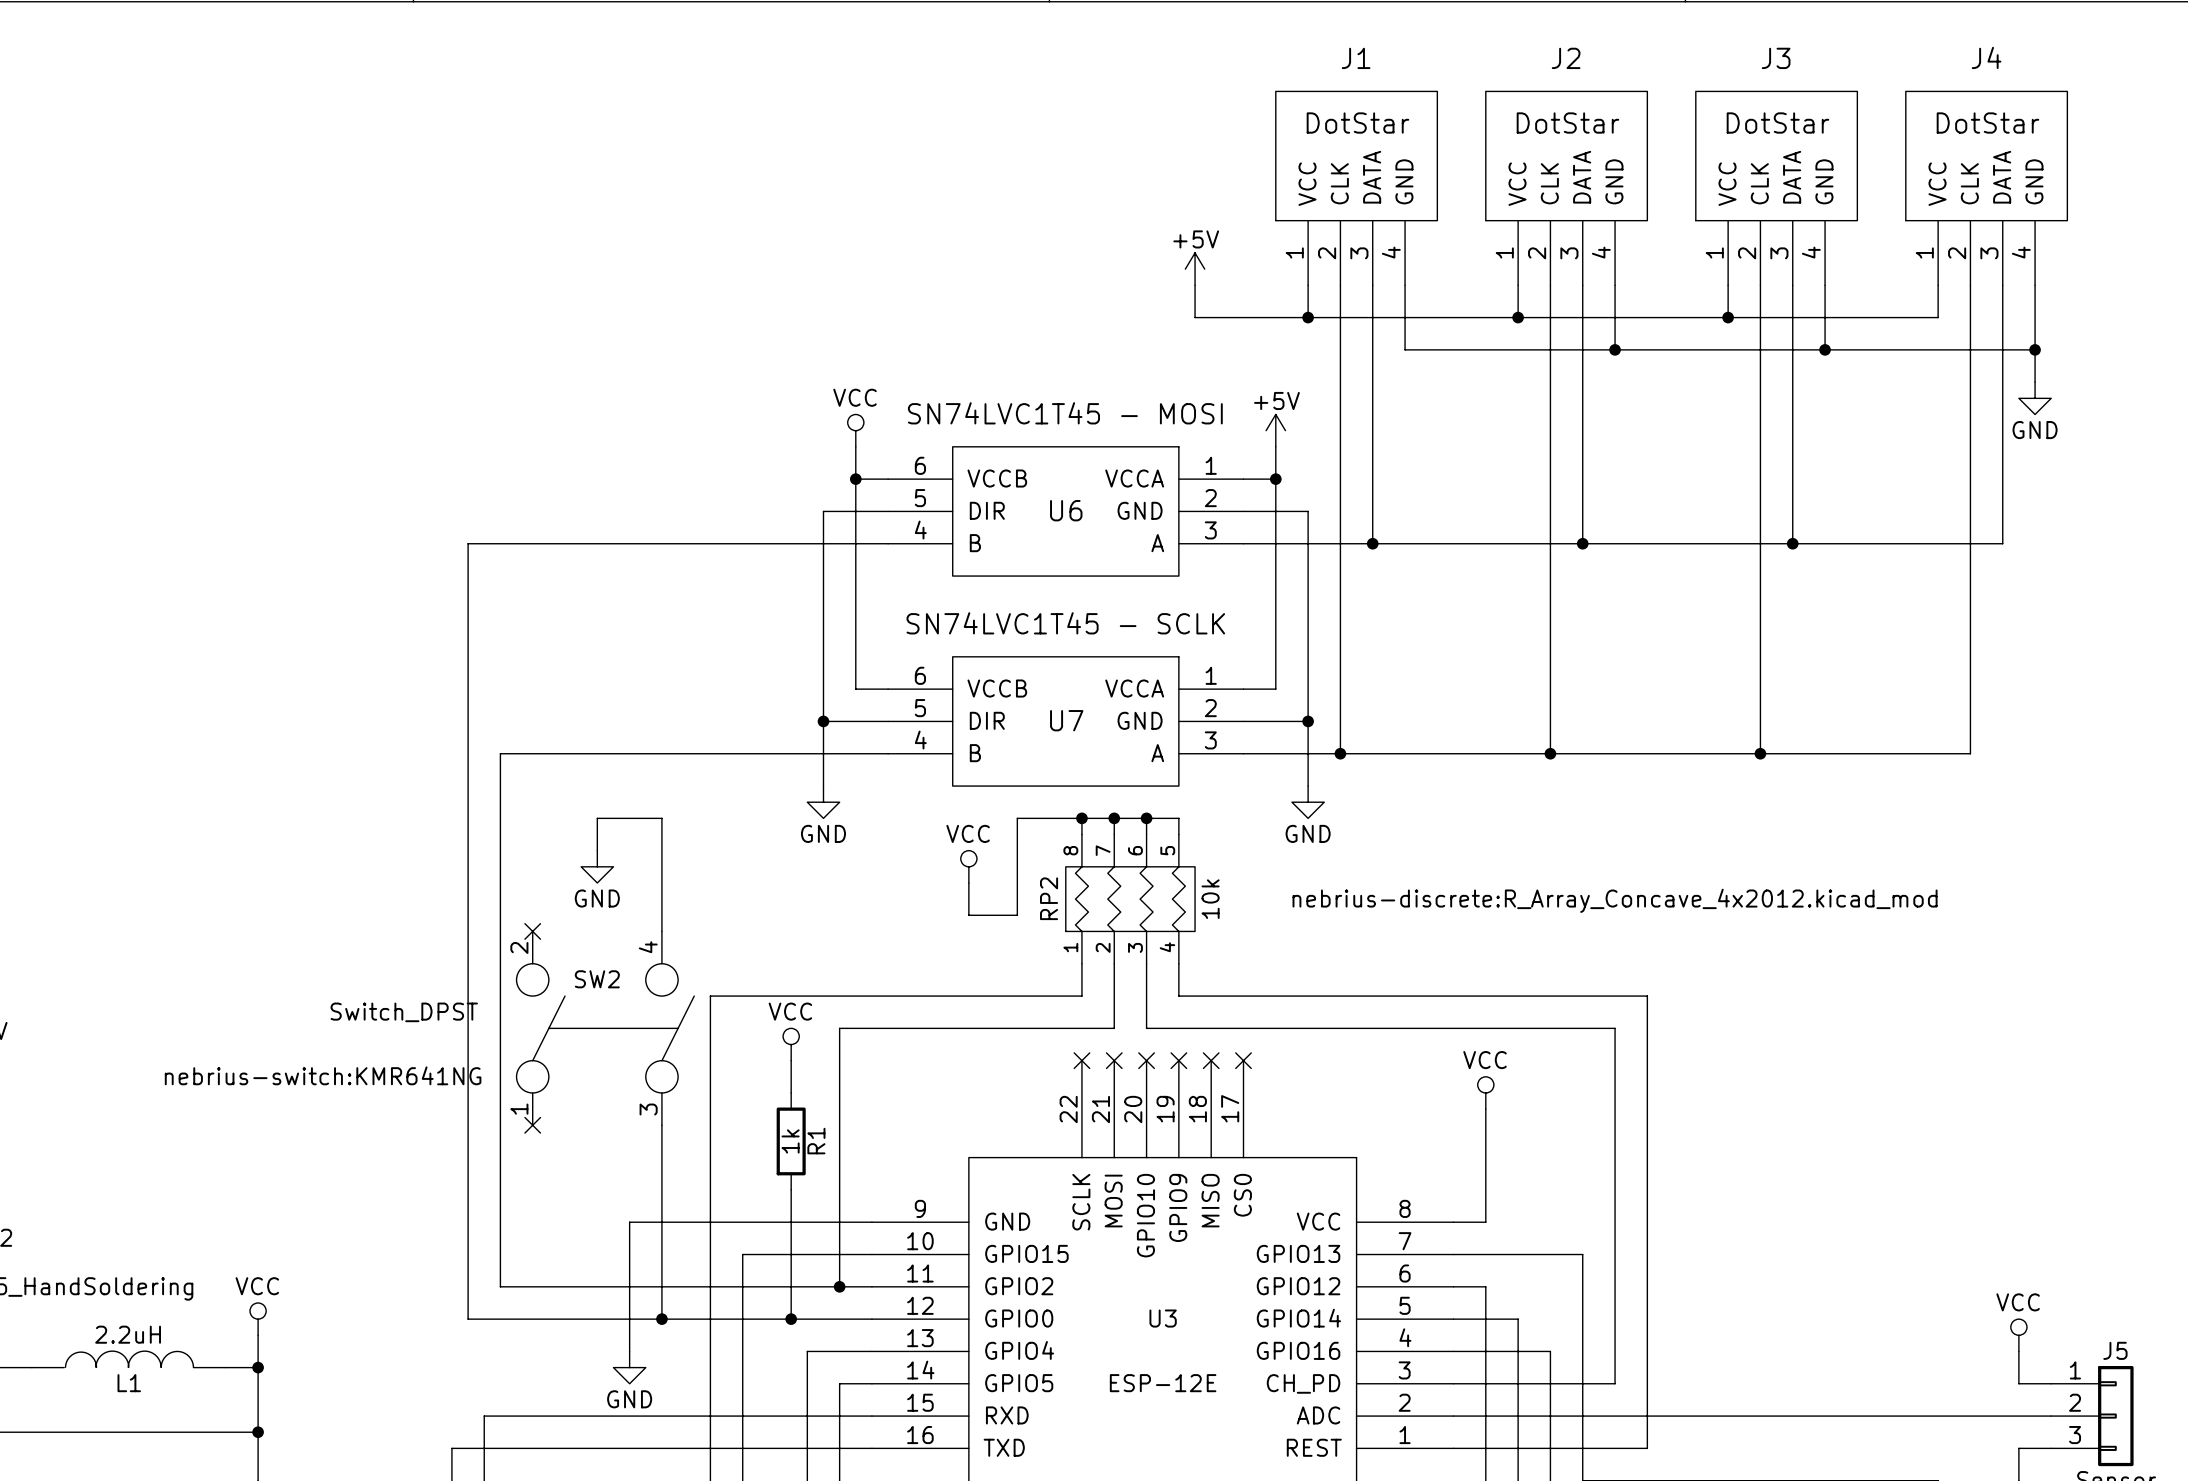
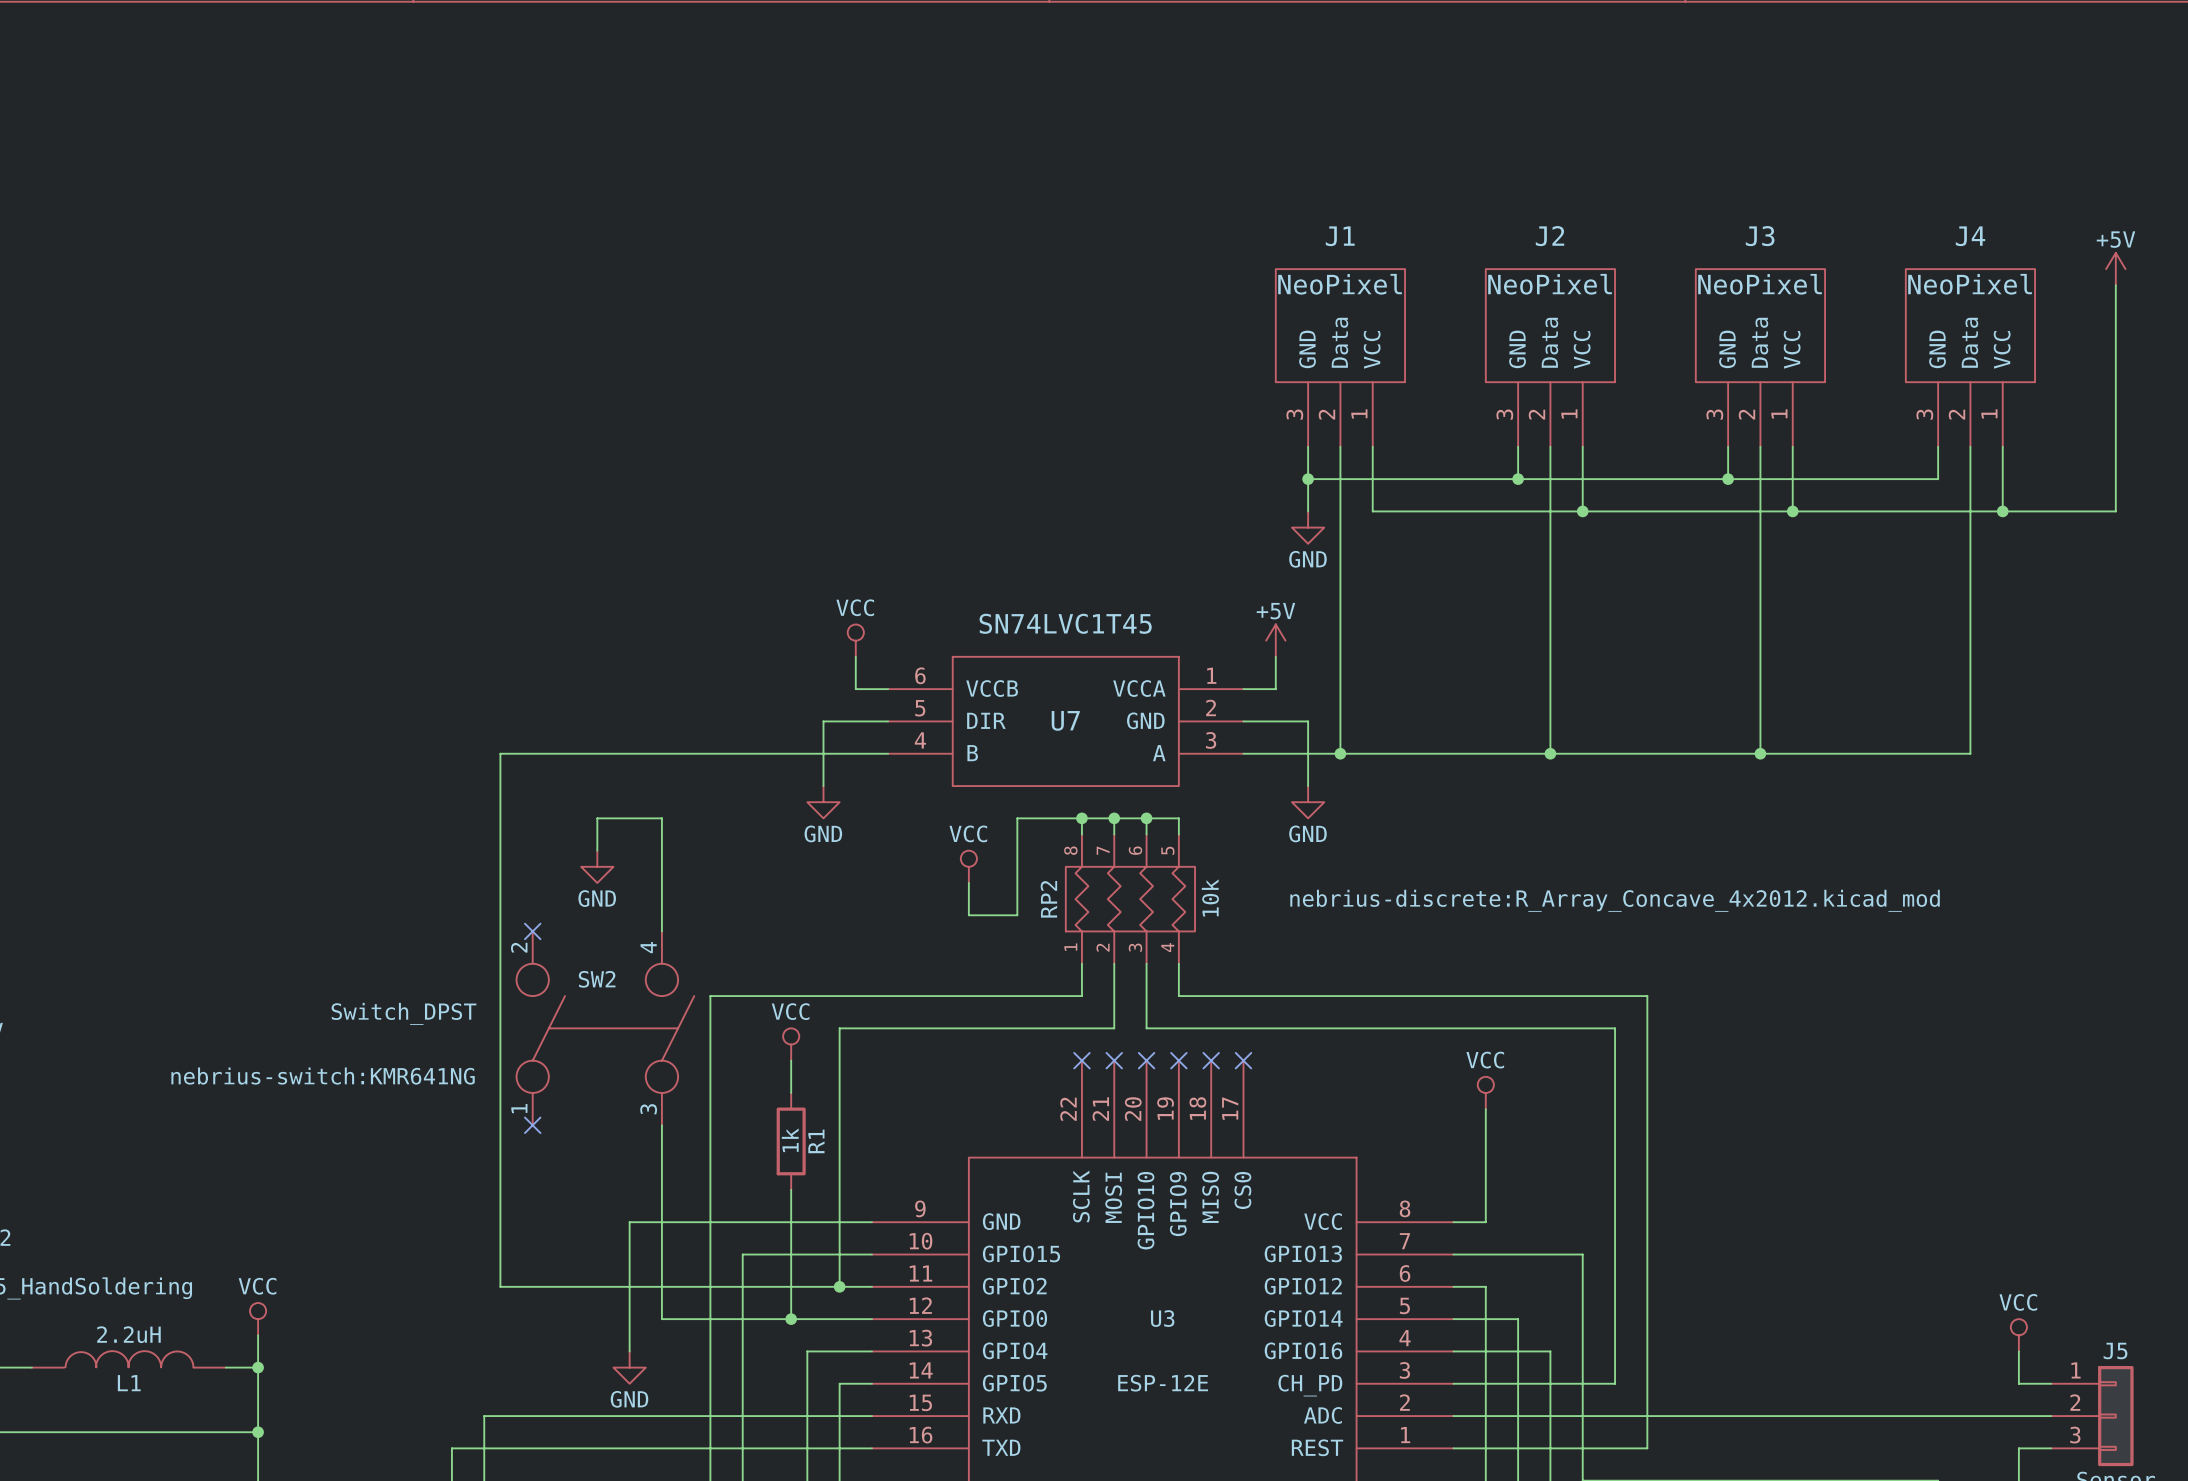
J1 symbol: [1275, 91, 1438, 286] -> [1275, 269, 1406, 447]
J2 symbol: [1485, 91, 1648, 286] -> [1485, 269, 1616, 447]
J3 symbol: [1695, 91, 1858, 286] -> [1695, 269, 1826, 447]
J4 symbol: [1905, 91, 2068, 286] -> [1905, 269, 2036, 447]
J1 value: DotStar (1357, 123) -> NeoPixel (1340, 284)
J2 value: DotStar (1567, 123) -> NeoPixel (1550, 284)
J3 value: DotStar (1777, 123) -> NeoPixel (1760, 284)
J4 value: DotStar (1987, 123) -> NeoPixel (1970, 284)
power symbol: +5V (1195, 269) -> none
power symbol: none -> +5V (2115, 269)
wire: (1195, 285) (1195, 317) (1938, 317) (1938, 285) -> none
wire: (1308, 285) (1308, 317) -> none
wire: (1340, 285) (1340, 446) -> none
wire: (1372, 285) (1372, 446) -> none
wire: (1405, 285) (1405, 349) (2035, 349) -> none
wire: (1518, 285) (1518, 317) -> none
wire: (1550, 285) (1550, 446) -> none
wire: (1582, 285) (1582, 446) -> none
wire: (1728, 285) (1728, 317) -> none
wire: (1760, 285) (1760, 446) -> none
wire: (1792, 285) (1792, 446) -> none
wire: (1970, 285) (1970, 446) -> none
wire: (2002, 285) (2002, 446) -> none
junction: (1308, 317) -> none
junction: (1518, 317) -> none
junction: (1728, 317) -> none
junction: (1615, 349) -> none
junction: (1825, 349) -> none
junction: (2035, 349) -> none
power symbol: GND (2035, 398) -> none
power symbol position: VCC (855, 430) -> VCC (855, 640)
power symbol: +5V (1275, 430) -> none
wire: (855, 446) (855, 656) -> none
wire: (1275, 446) (1275, 656) -> none
wire: none -> (1308, 446) (1308, 511)
wire: none -> (1938, 446) (1938, 479) (1308, 479)
wire: (855, 479) (888, 479) -> none
junction: (855, 479) -> none
wire: (1243, 479) (1275, 479) -> none
junction position: (1275, 479) -> (1308, 479)
junction: none -> (1518, 479)
junction: none -> (1728, 479)
wire: (888, 511) (823, 511) (823, 721) -> none
U6: SN74LVC1T45 - MOSI (1065, 511) -> none
wire: (1243, 511) (1308, 511) (1308, 721) -> none
wire: (1372, 511) (1372, 543) -> (1372, 511) (2115, 511) (2115, 285)
wire: (1582, 511) (1582, 543) -> (1518, 446) (1518, 479)
wire: (1792, 511) (1792, 543) -> (1728, 446) (1728, 479)
wire: (2002, 511) (2002, 543) (1243, 543) -> none
junction: none -> (2002, 511)
power symbol: none -> GND (1308, 527)
wire: (888, 543) (468, 543) (468, 1319) (661, 1319) -> none
junction: (1372, 543) -> none
junction position: (1582, 543) -> (1582, 511)
junction position: (1792, 543) -> (1792, 511)
U7 value: SN74LVC1T45 - SCLK (1065, 623) -> SN74LVC1T45 (1065, 623)
power symbol: none -> +5V (1275, 640)
junction: (823, 721) -> none
junction: (1308, 721) -> none
junction: (661, 1319) -> none

